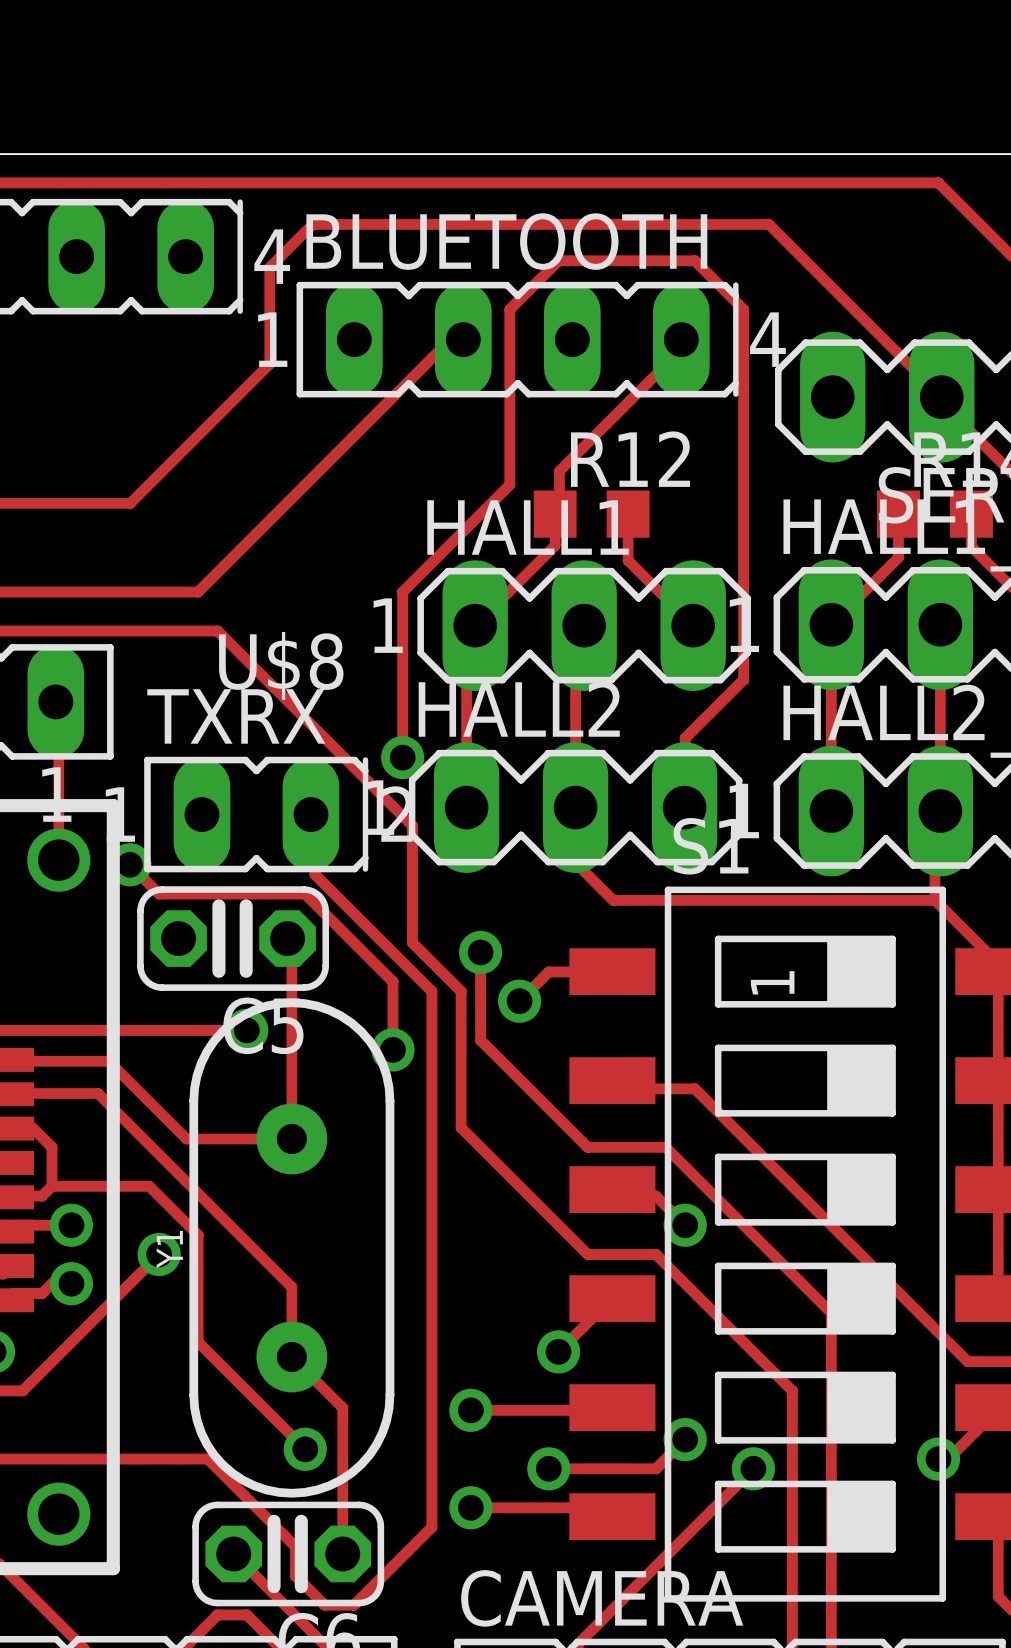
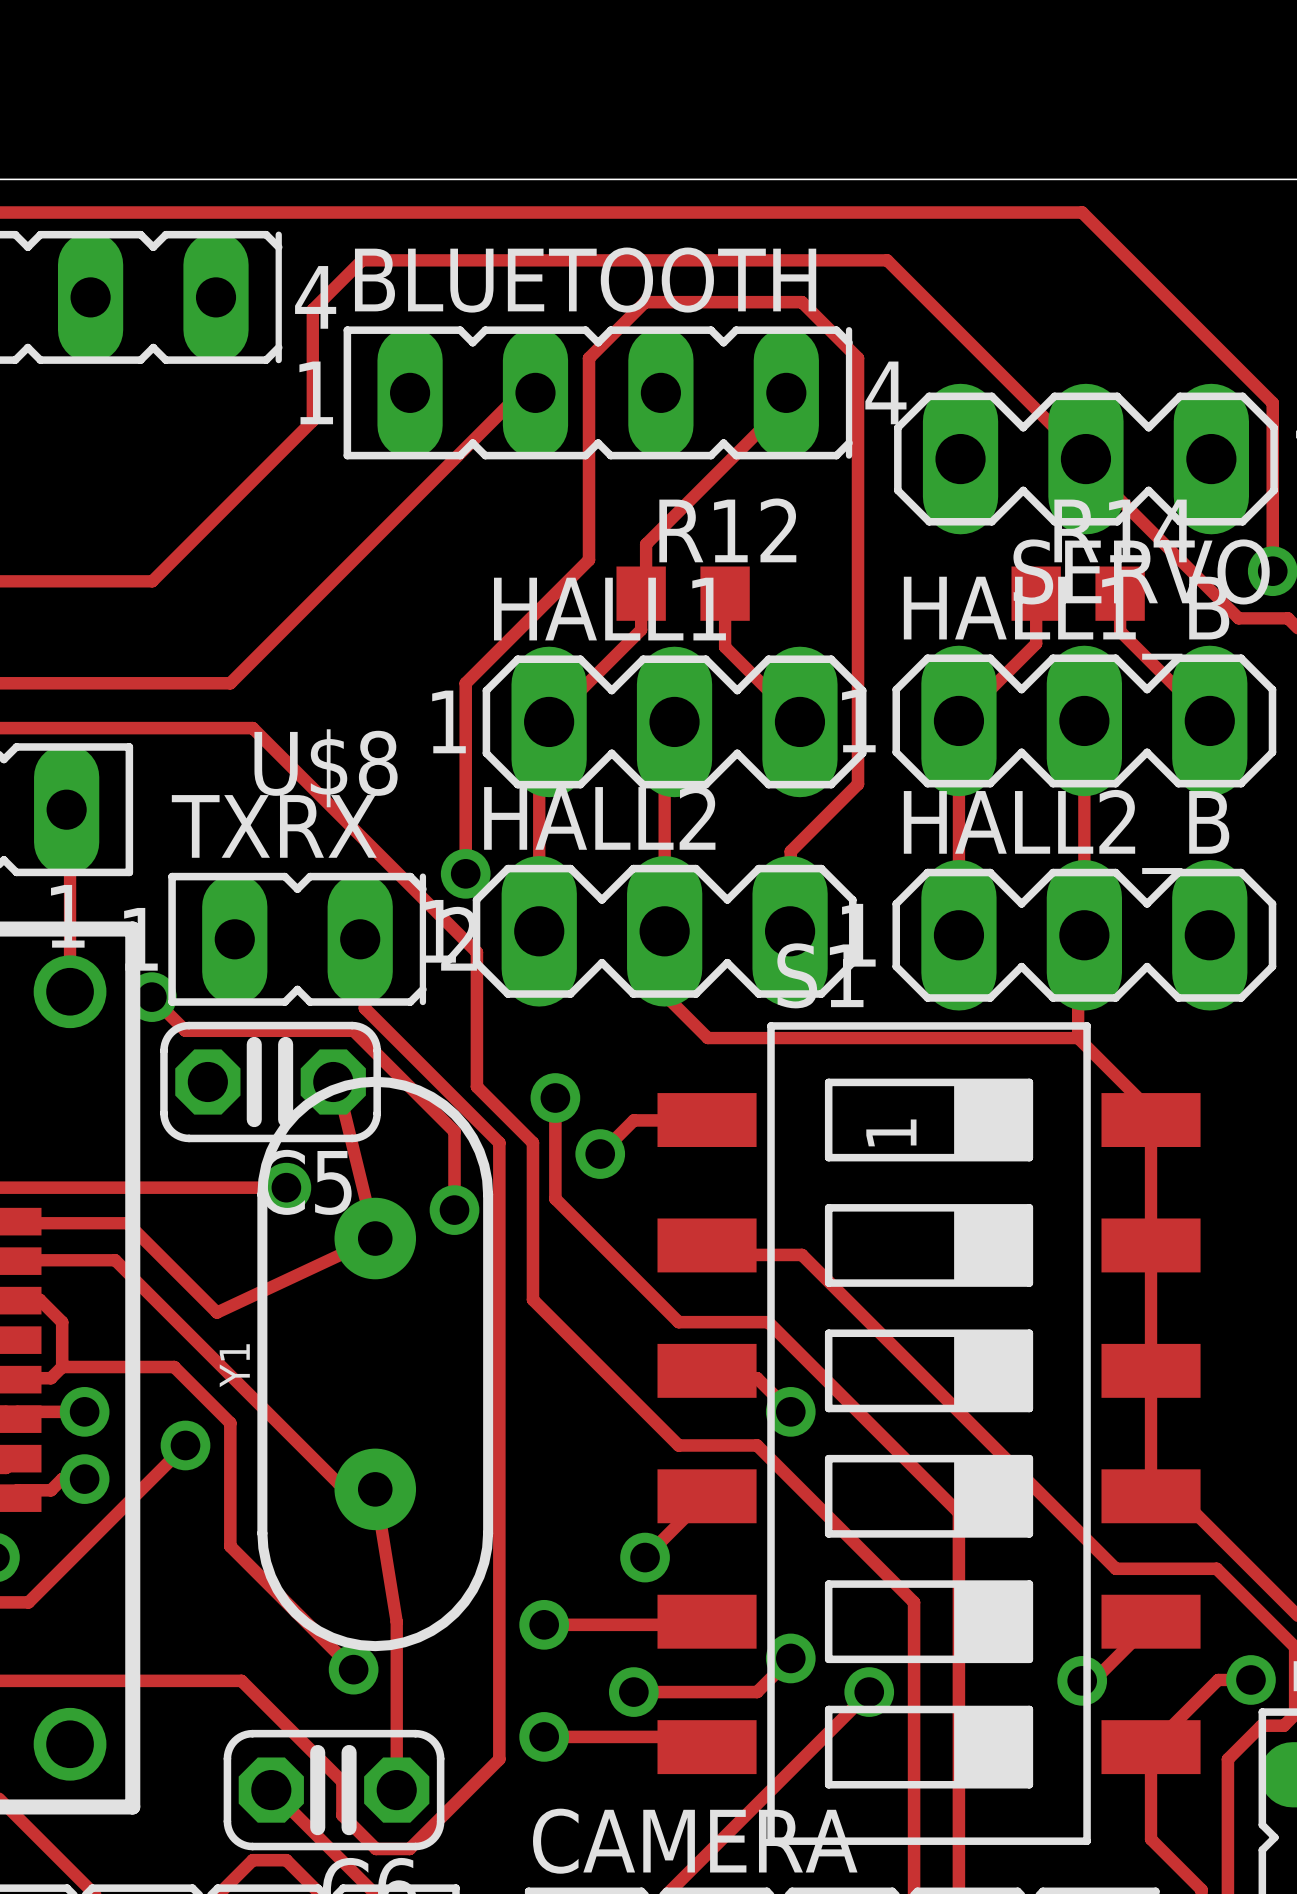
track: (291, 942) (291, 1138) (186, 1138) -> (338, 1086) (375, 1238) (217, 1312)
Y1 position: (291, 1248) -> (375, 1363)
track: (291, 1287) (291, 1357) (342, 1407) -> (338, 1483) (375, 1489) (396, 1621)

